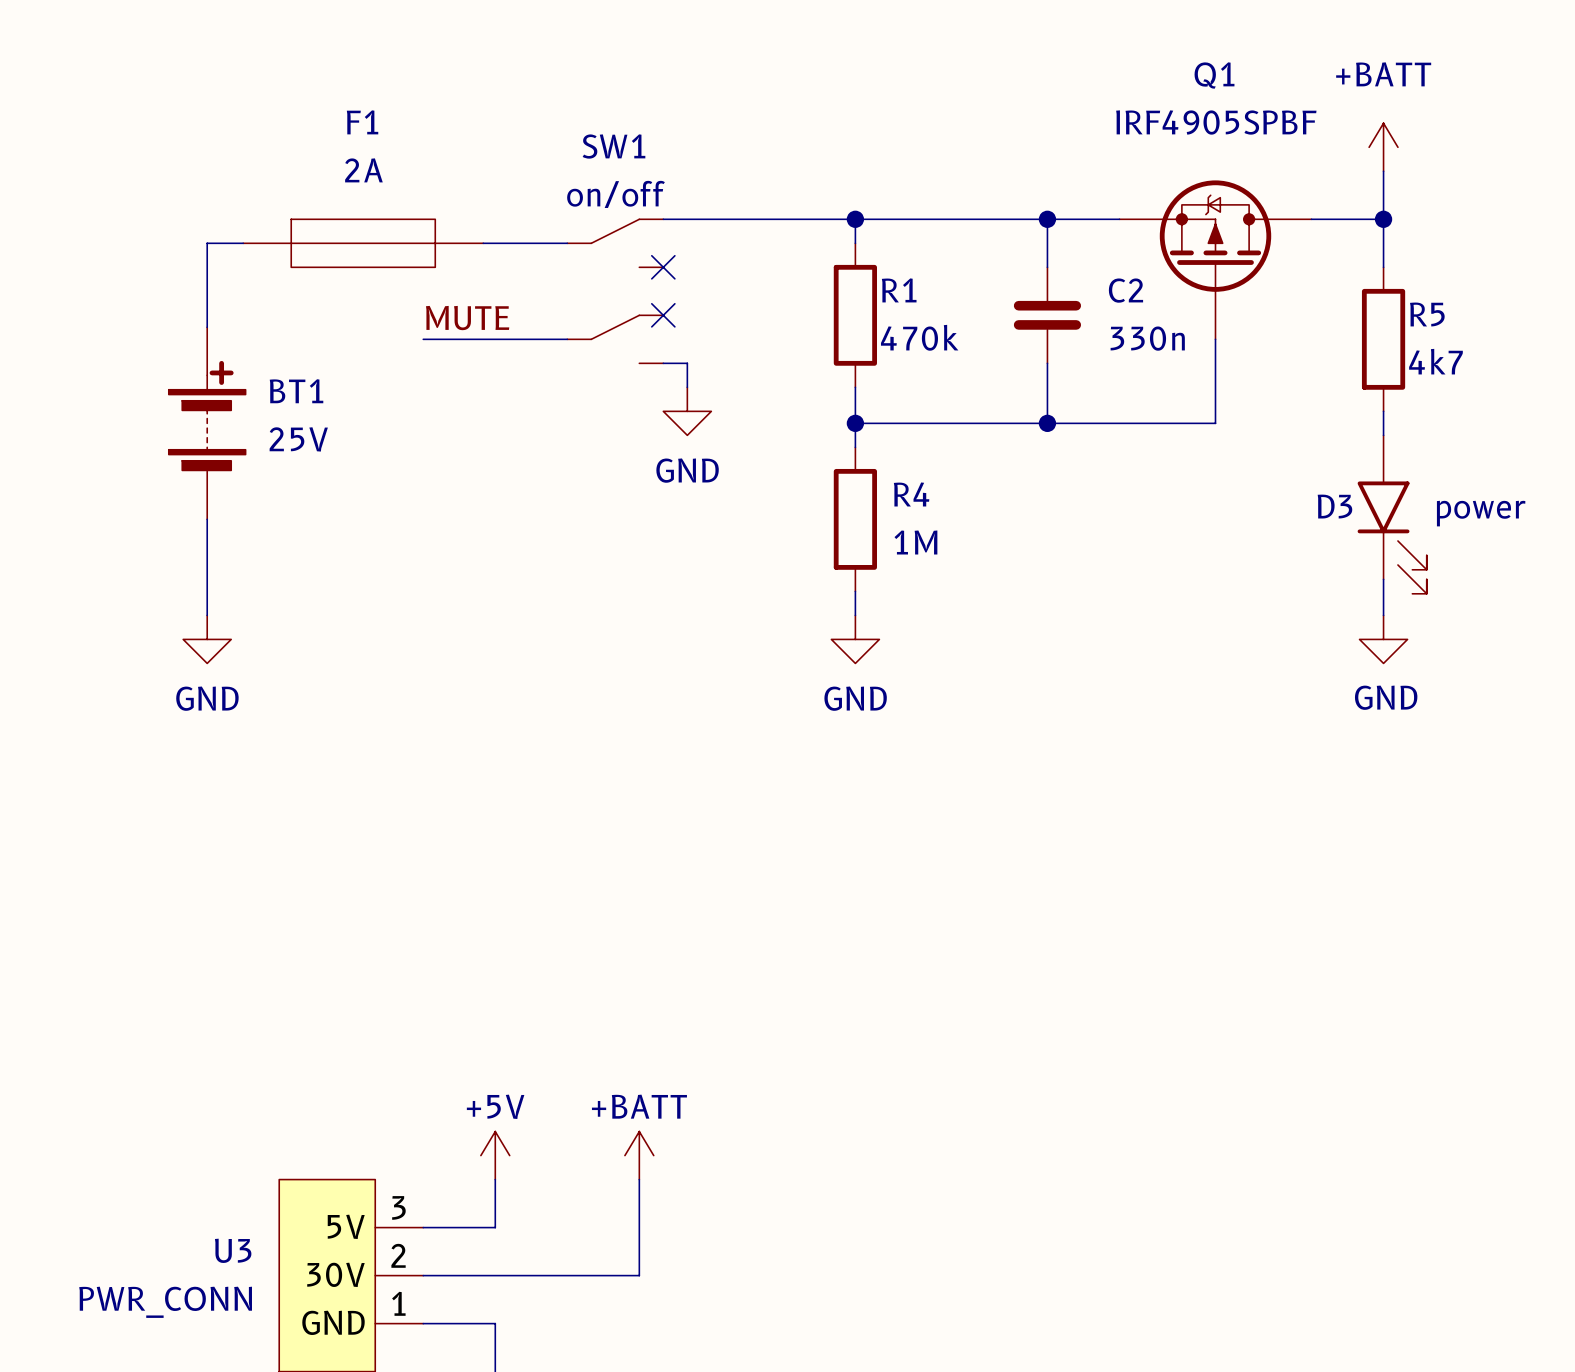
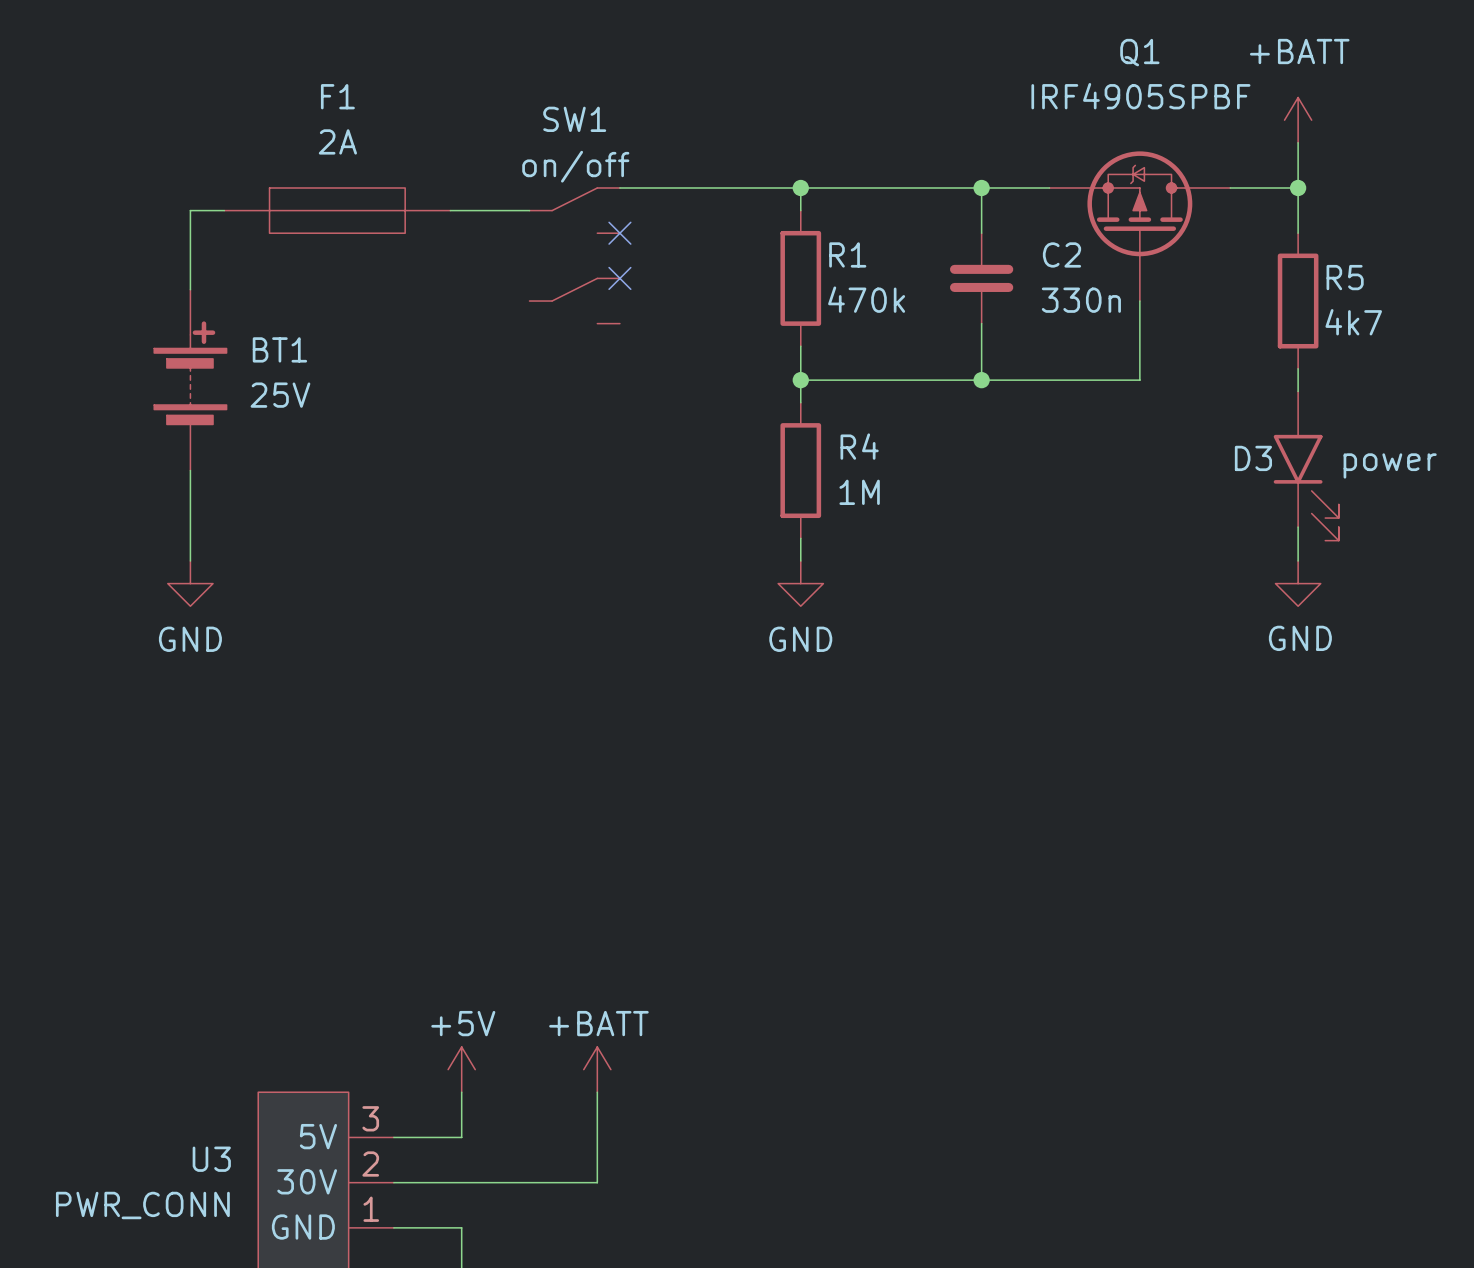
label: MUTE (467, 318) -> none
wire: (423, 339) (567, 339) -> none
wire: (663, 363) (687, 363) (687, 387) -> none
power symbol: GND (687, 411) -> none

